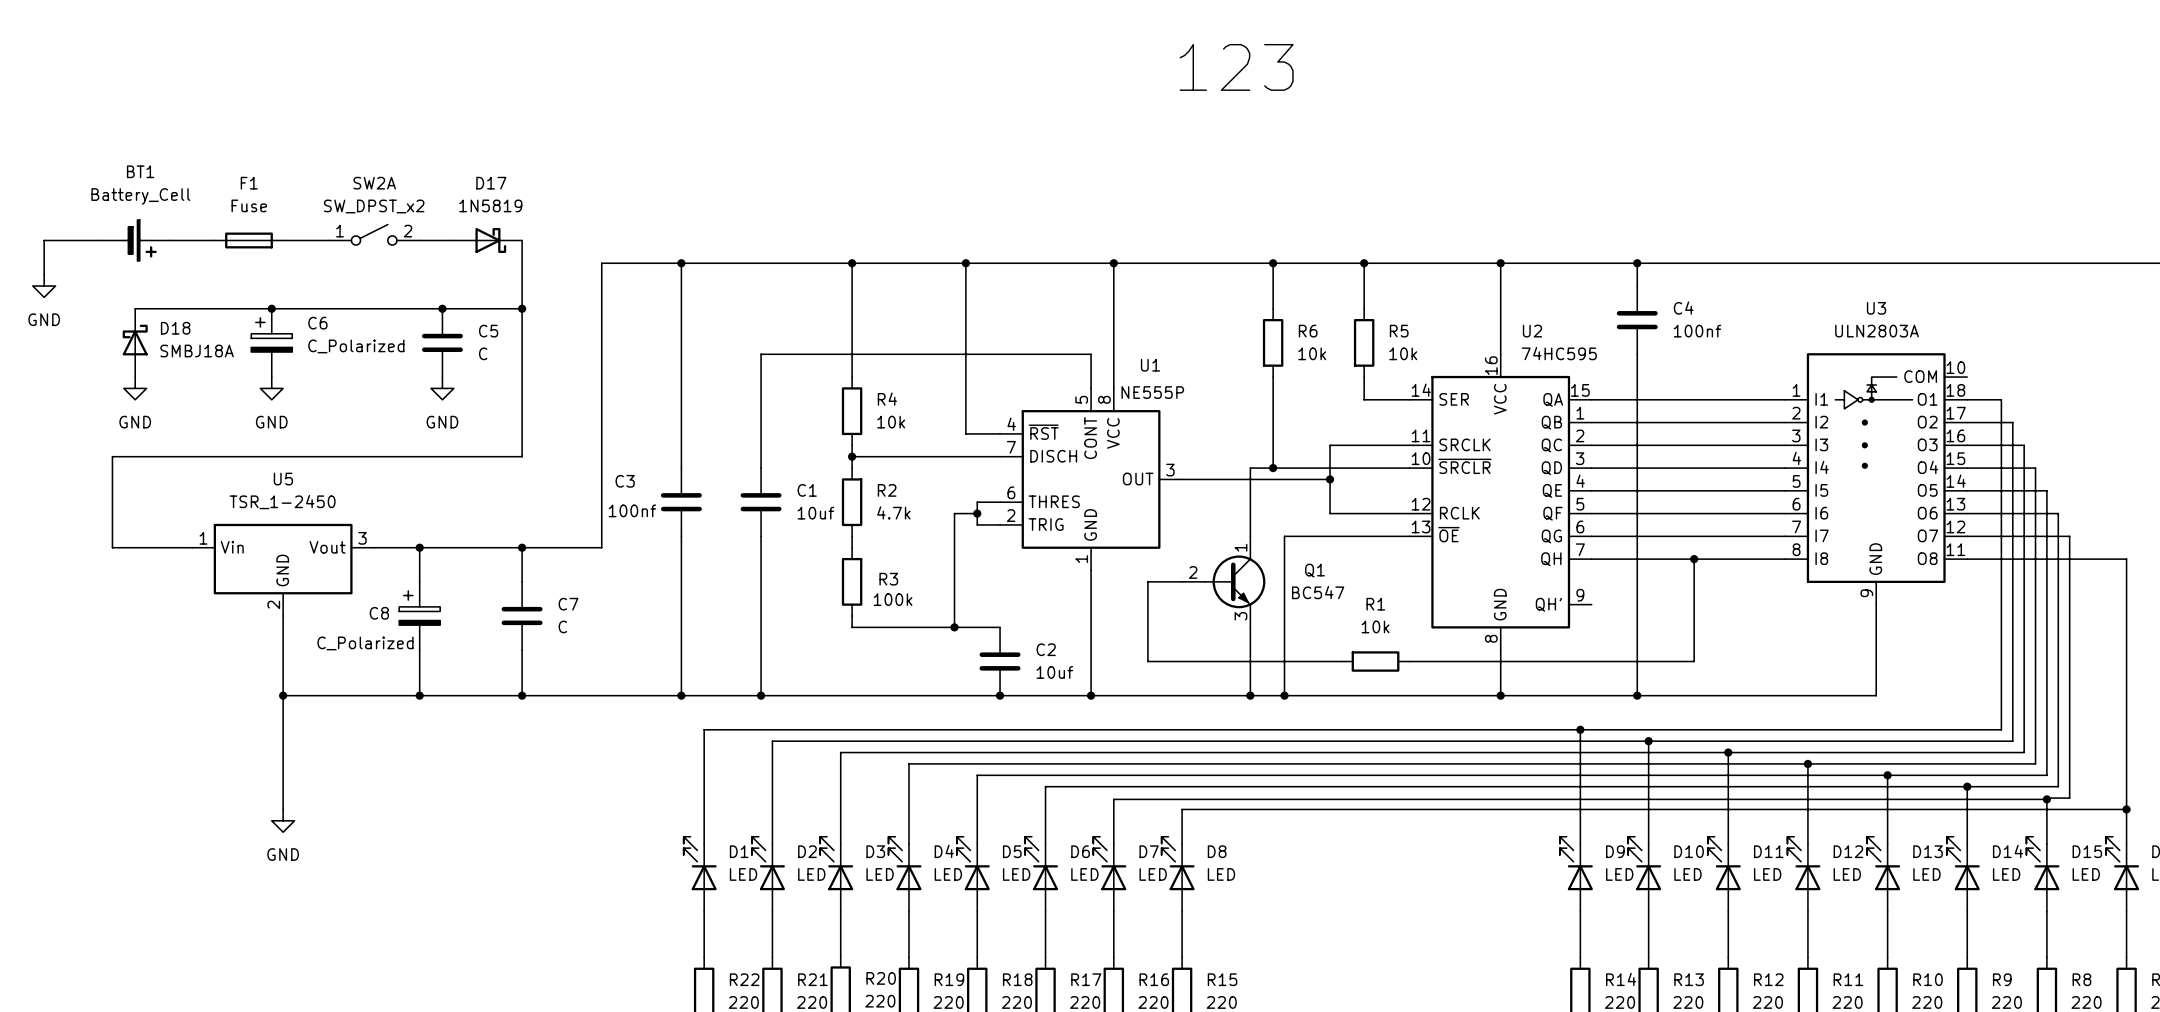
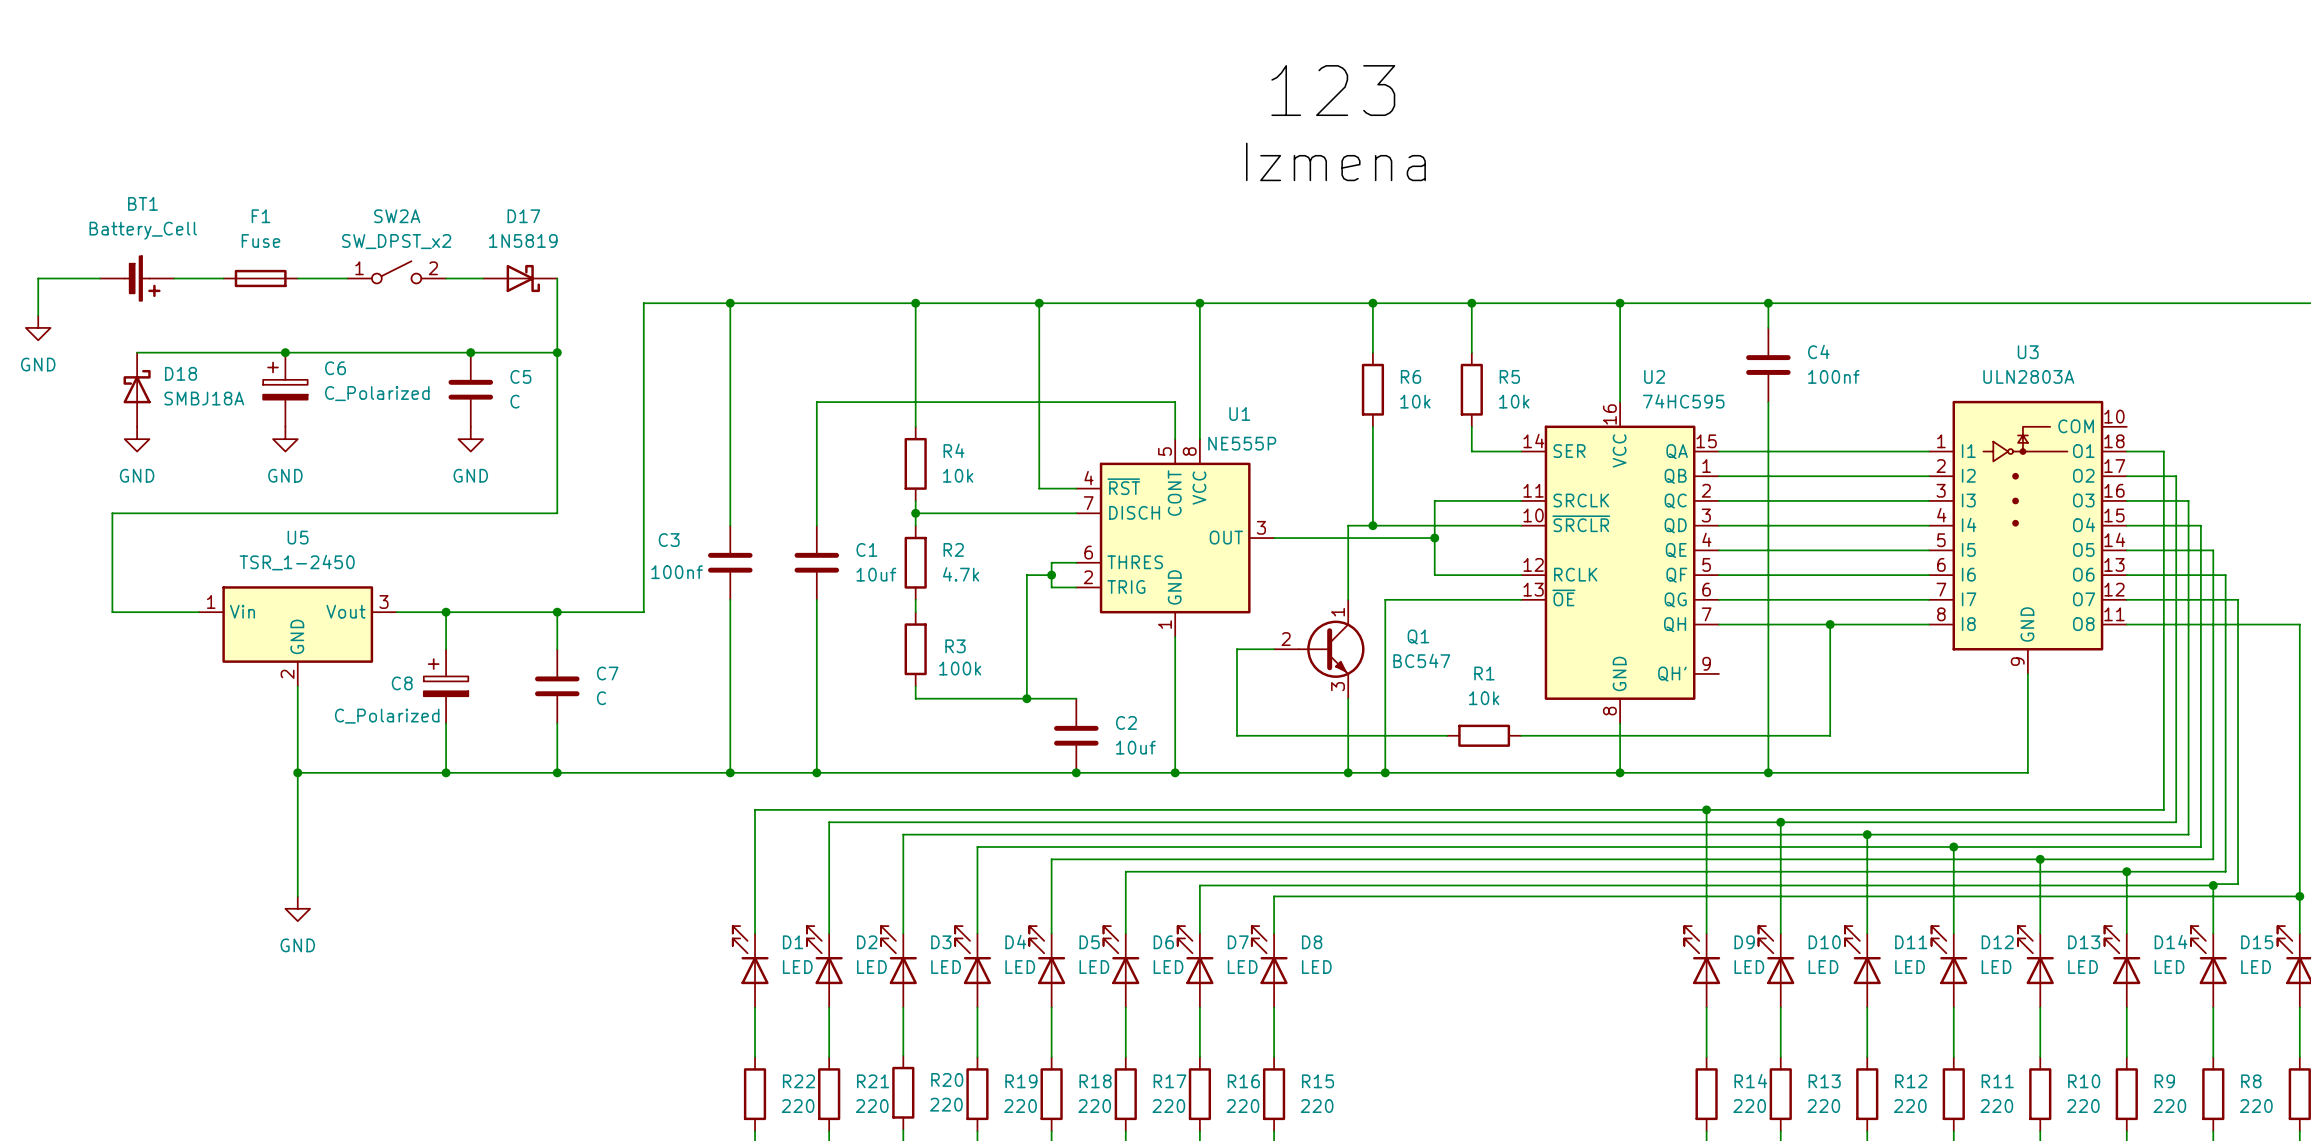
label: none -> Izmena (1335, 161)

